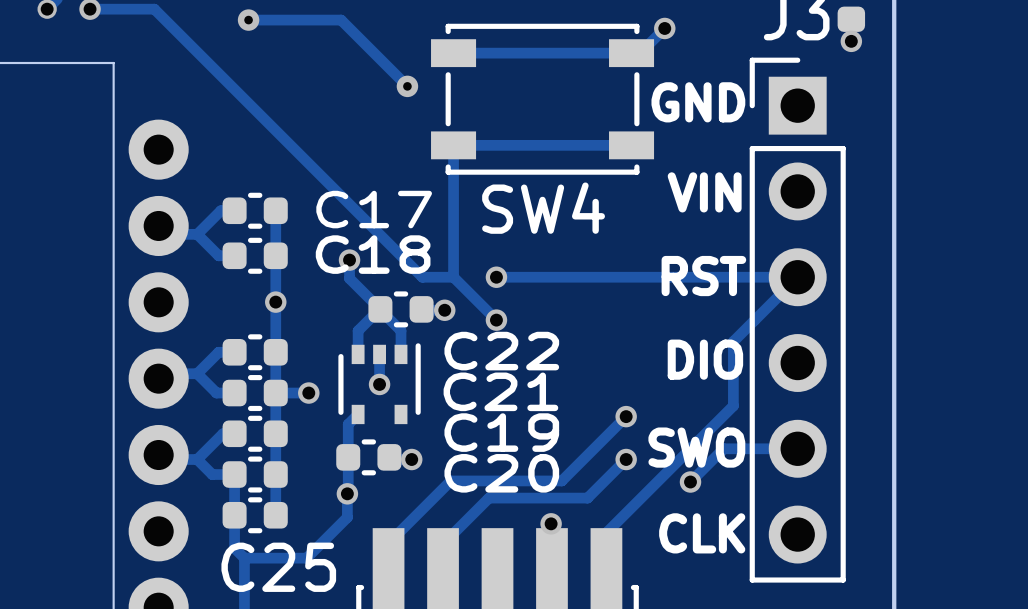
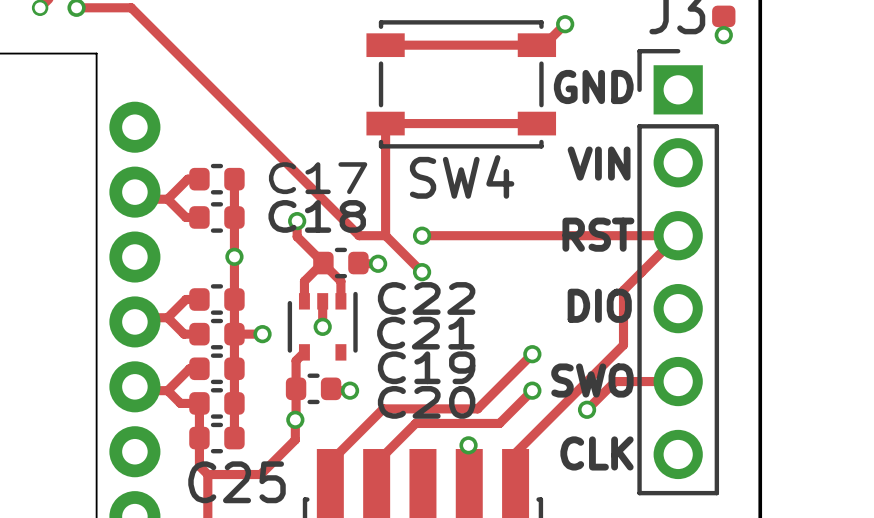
track: (248, 20) (341, 20) (407, 86) -> none
via: (248, 20) -> none
via: (407, 86) -> none

